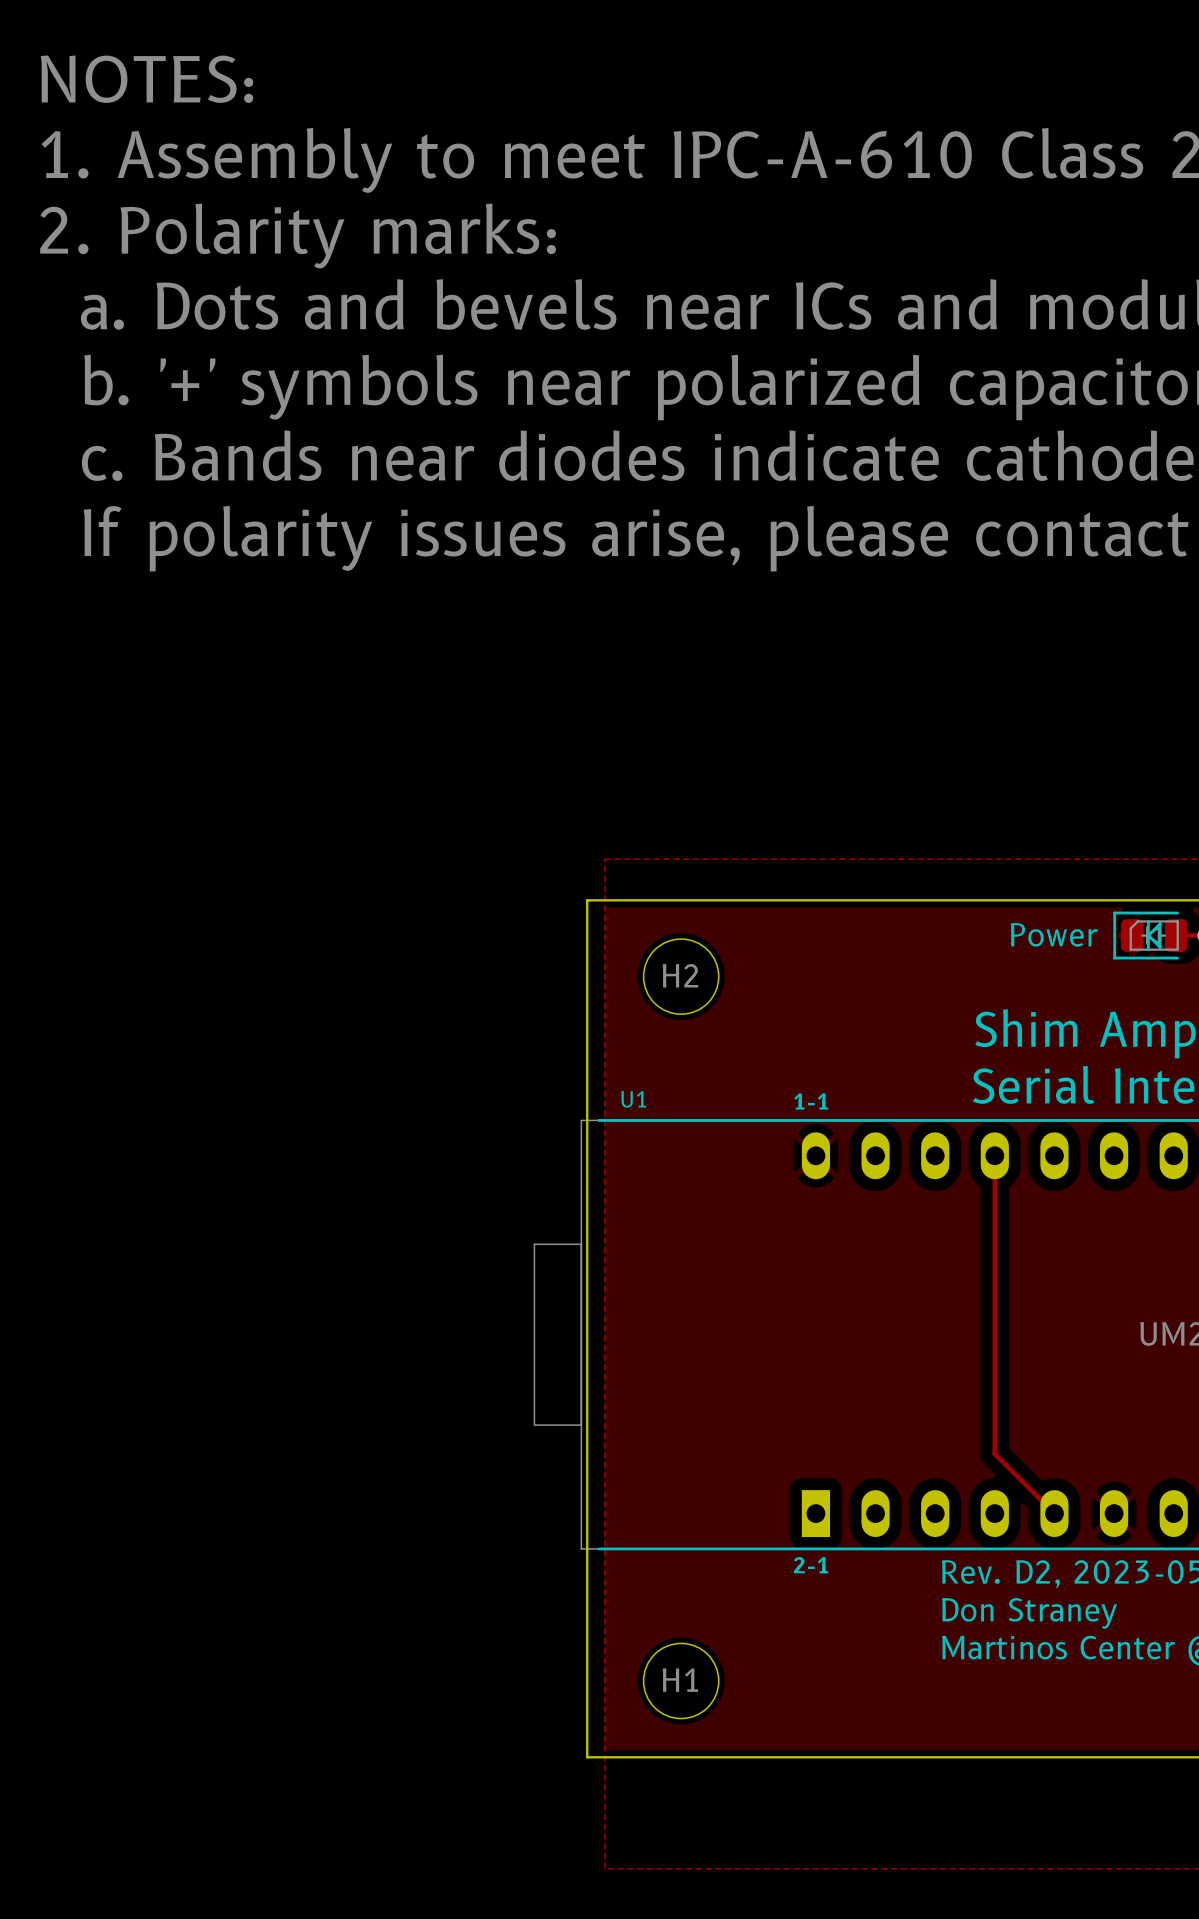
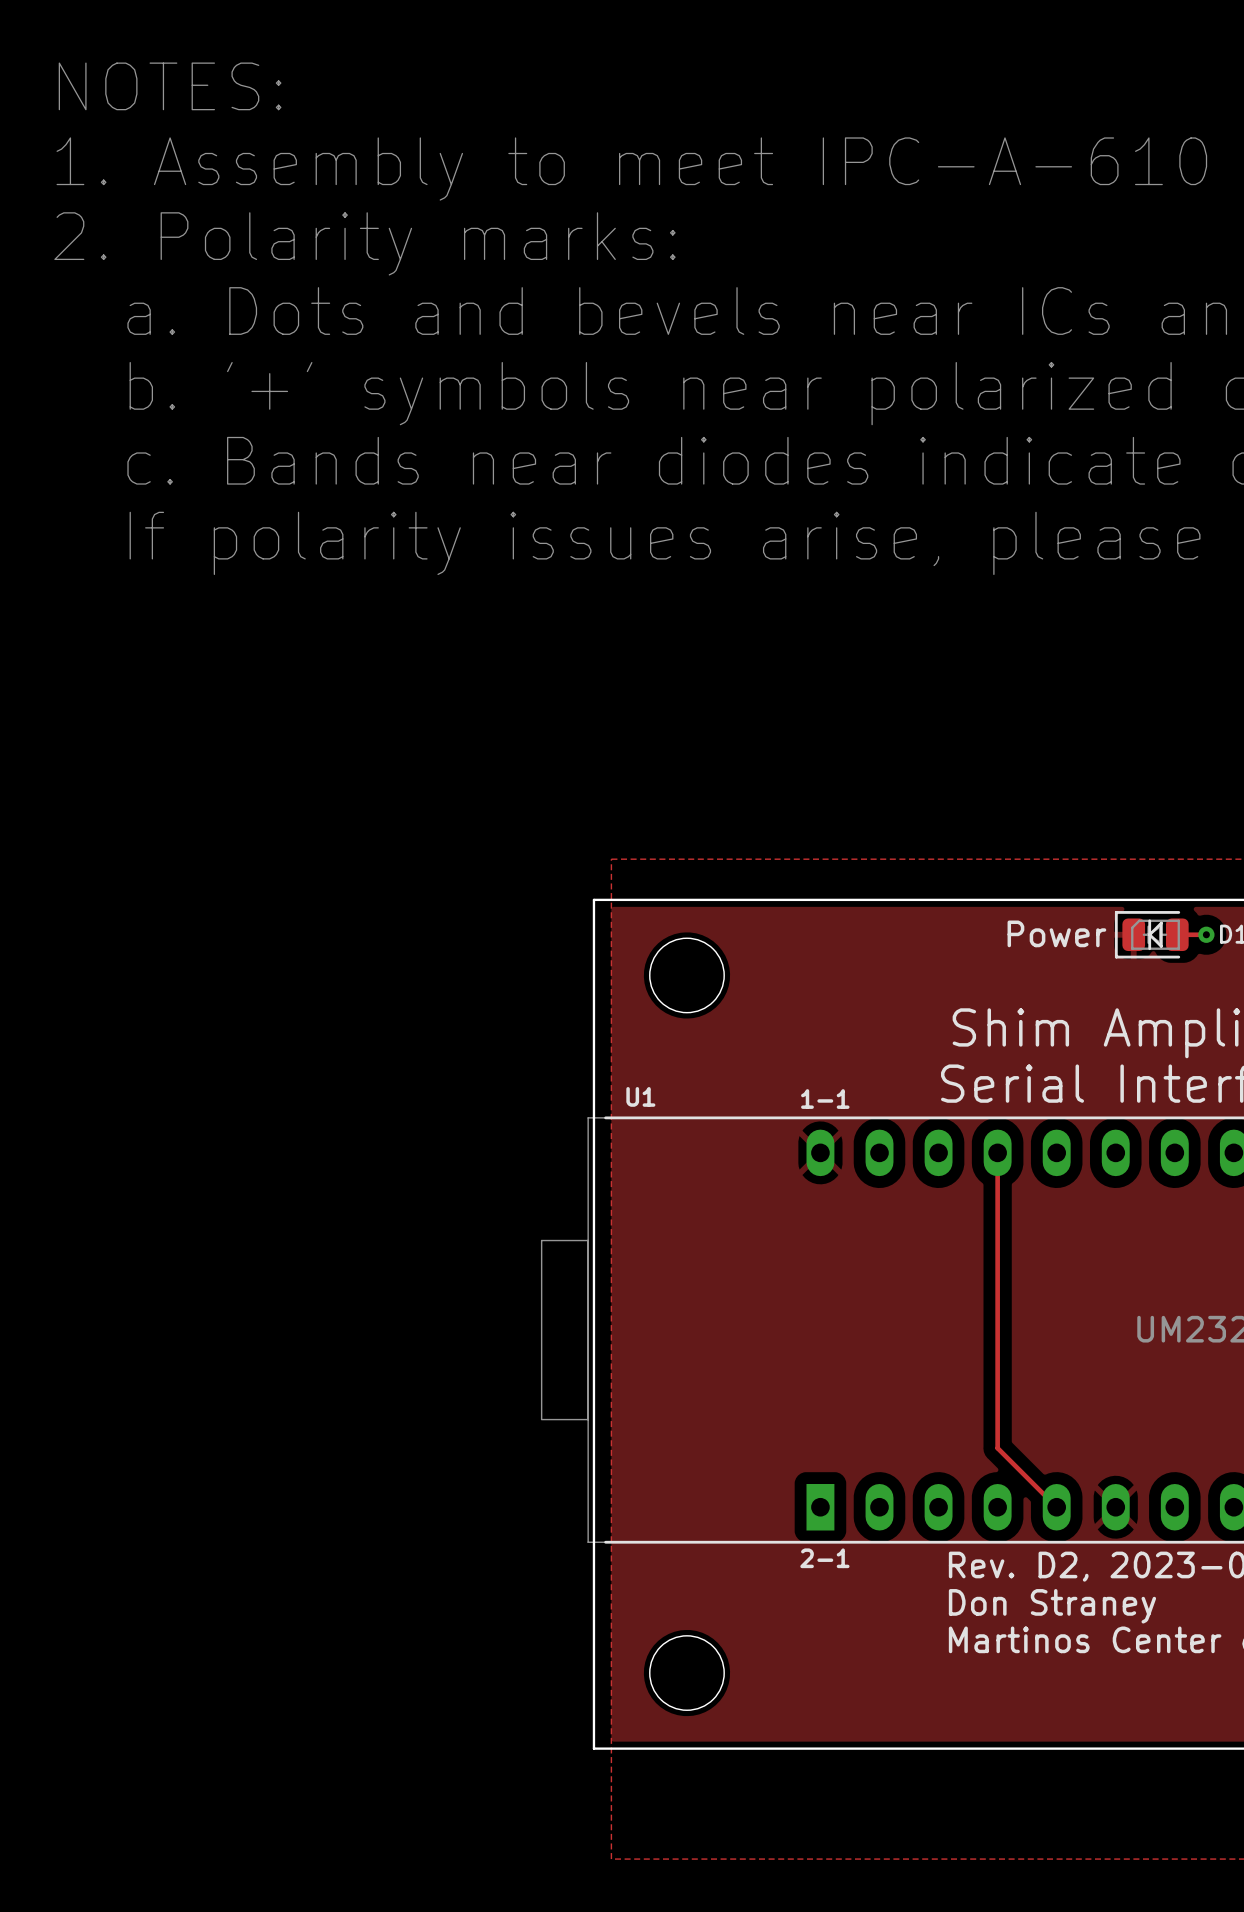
H2 name: H2 (680, 975) -> none
H1 name: H1 (680, 1680) -> none

